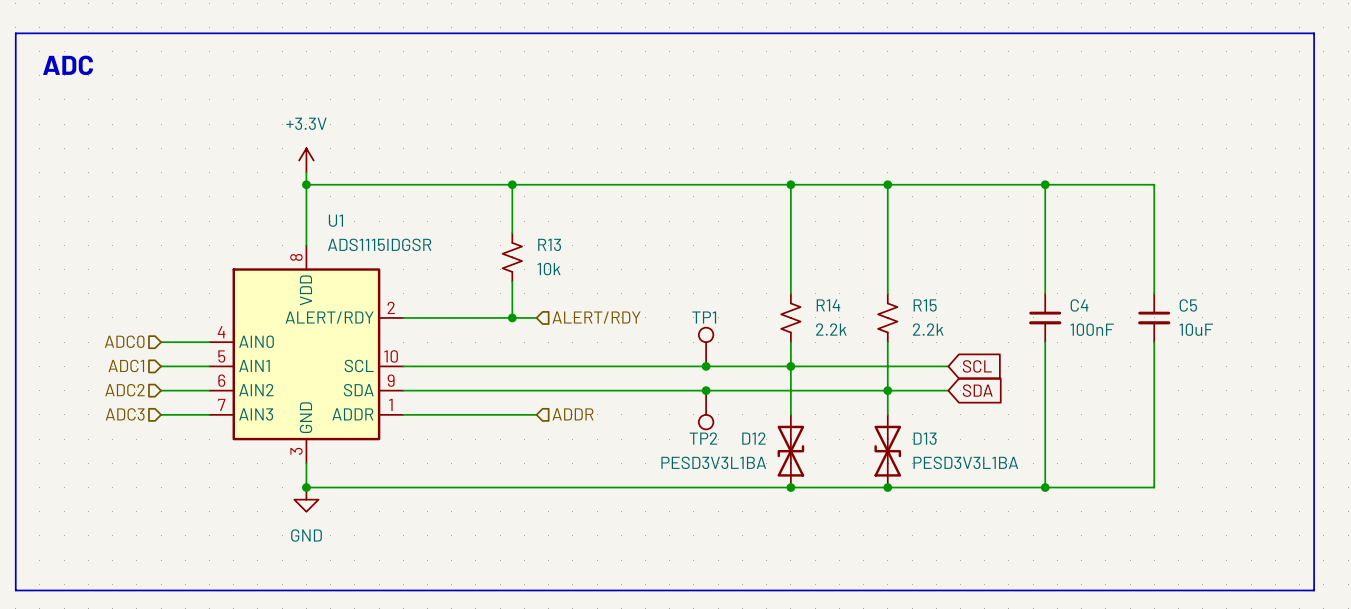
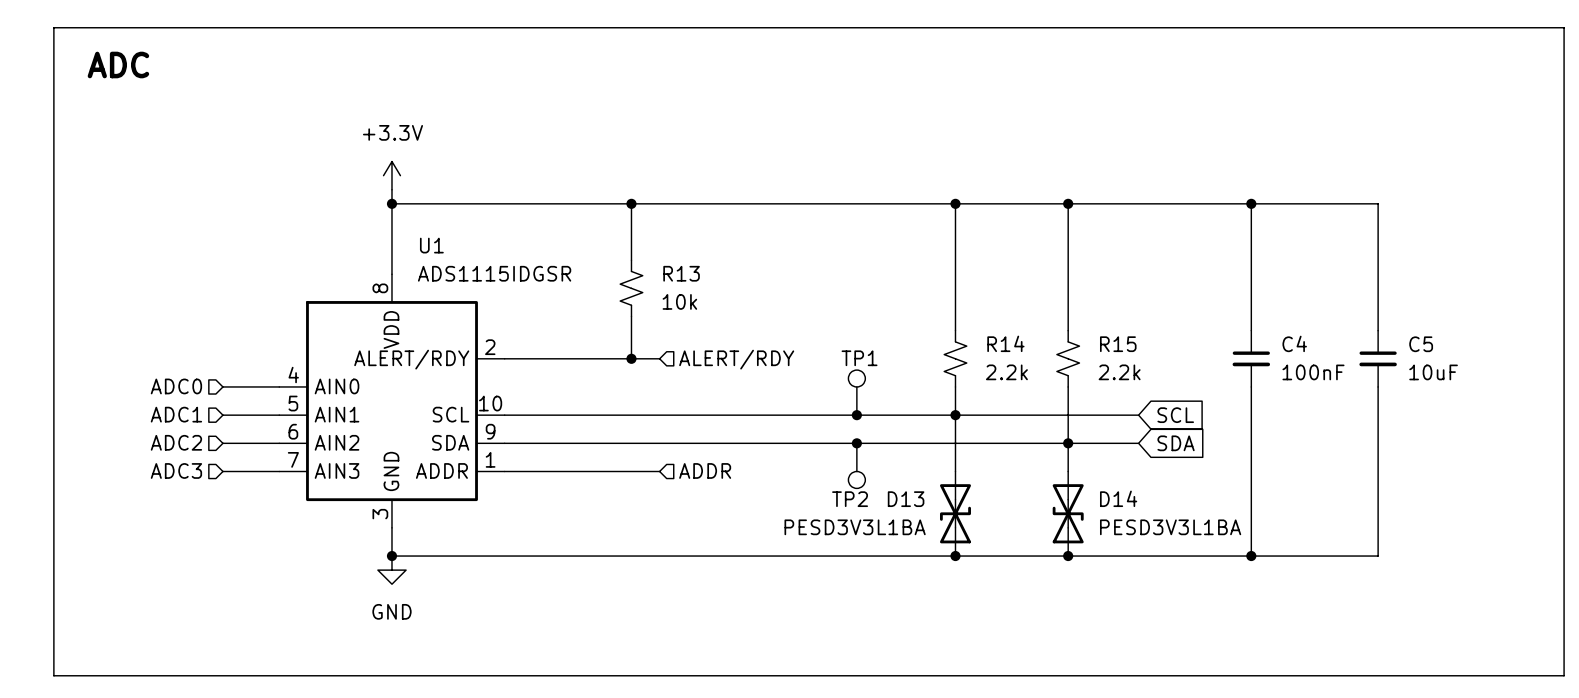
D12 name: D12 (753, 438) -> D13 (906, 499)
D13 name: D13 (925, 438) -> D14 (1118, 498)

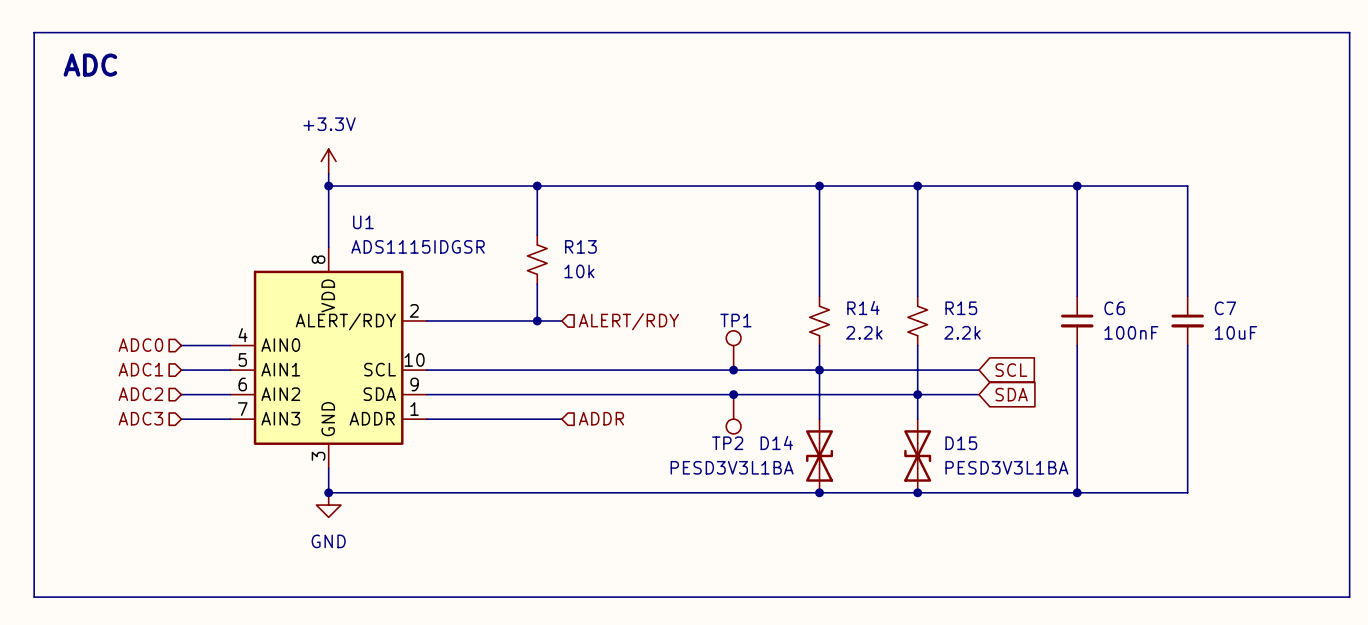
C4 name: C4 (1294, 343) -> C6 (1114, 308)
C5 name: C5 (1421, 344) -> C7 (1225, 308)
D14 name: D14 (1118, 498) -> D15 (961, 443)
D13 name: D13 (906, 499) -> D14 (776, 442)

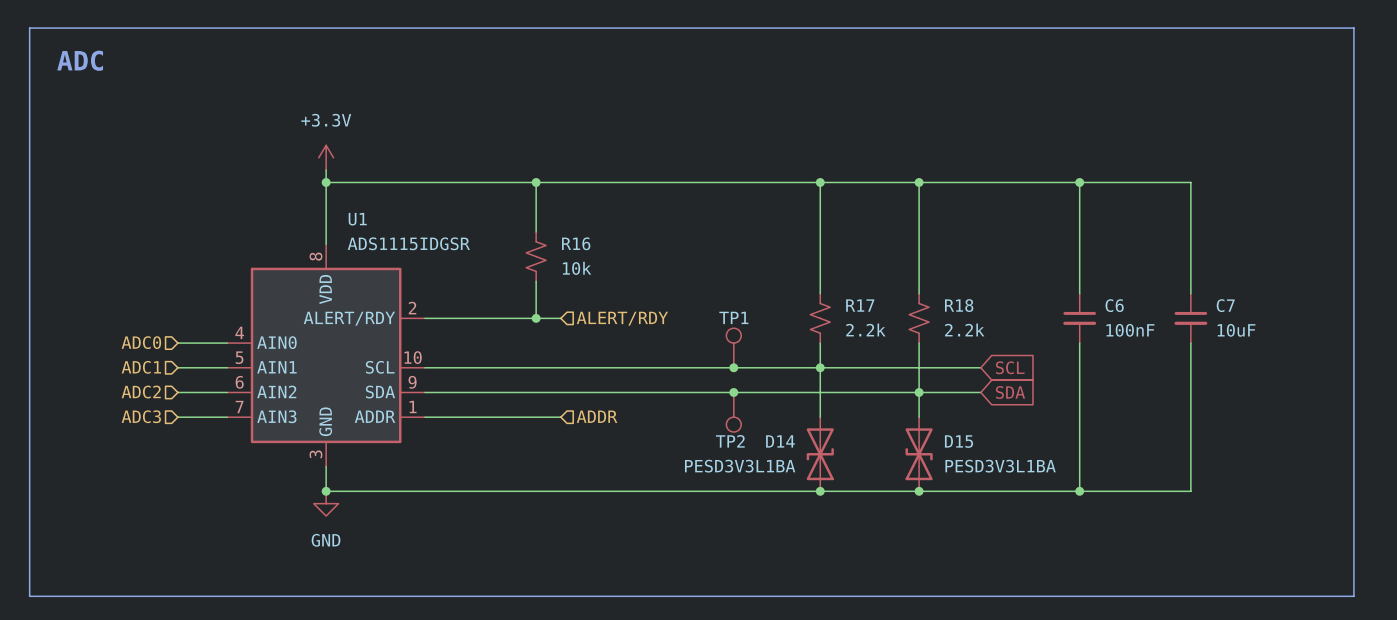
R13 name: R13 (580, 246) -> R16 (576, 243)
R14 name: R14 (863, 307) -> R17 (860, 305)
R15 name: R15 (961, 308) -> R18 (959, 305)

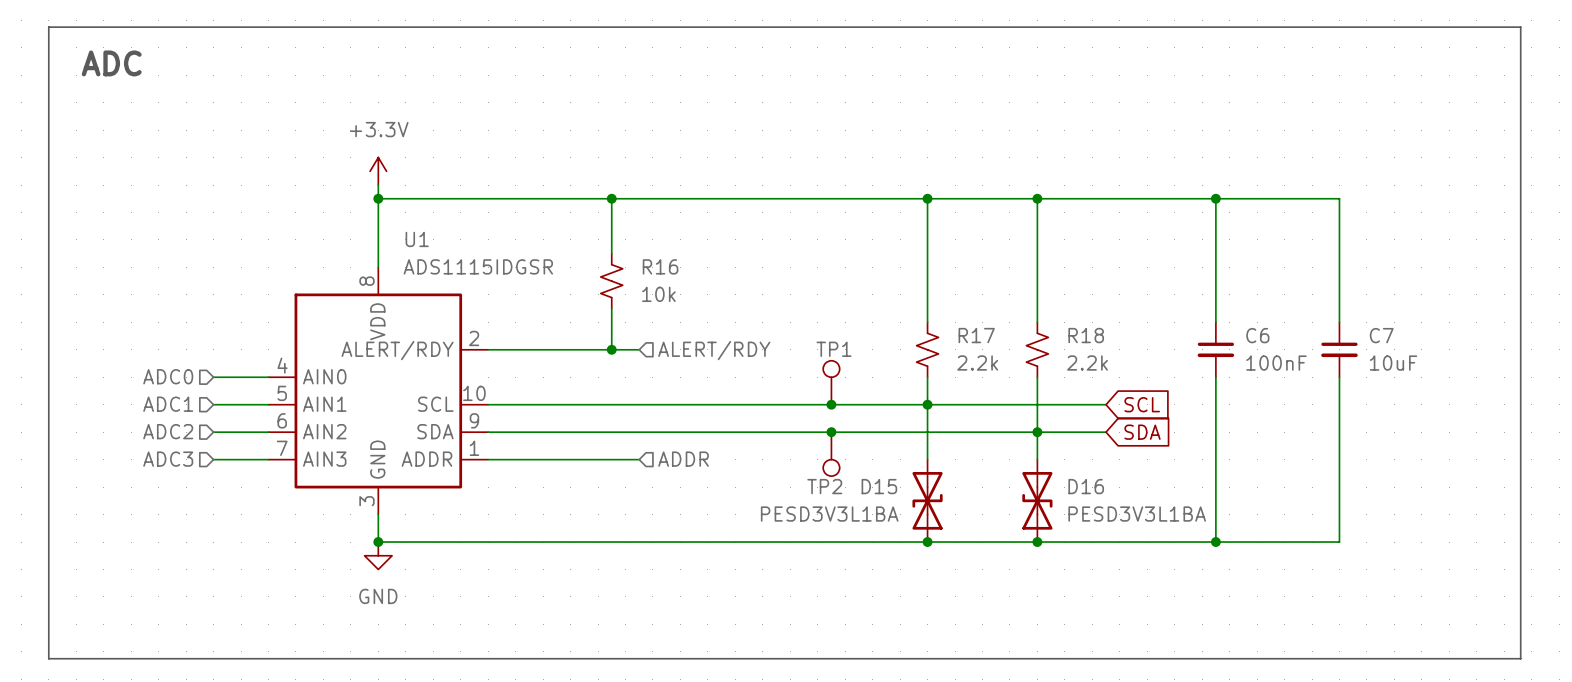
D14 name: D14 (780, 441) -> D15 (879, 486)
D15 name: D15 (958, 441) -> D16 (1086, 486)

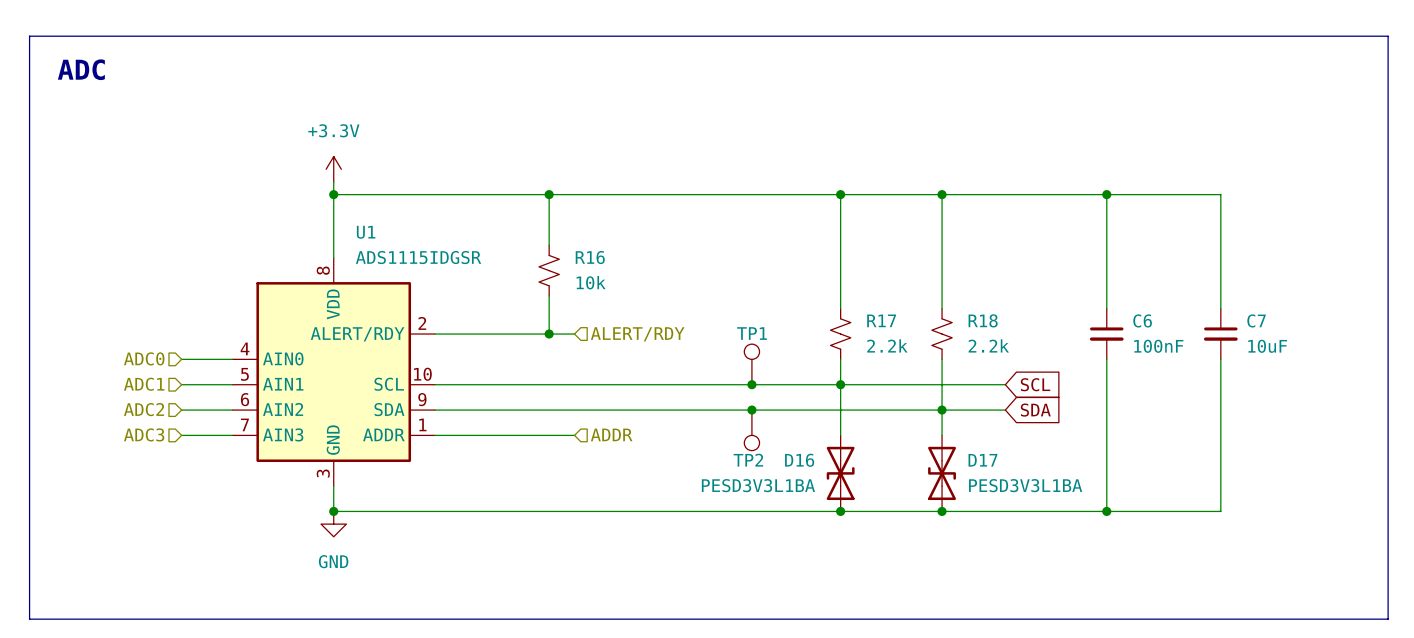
D15 name: D15 (879, 486) -> D16 (799, 460)
D16 name: D16 (1086, 486) -> D17 (982, 460)

